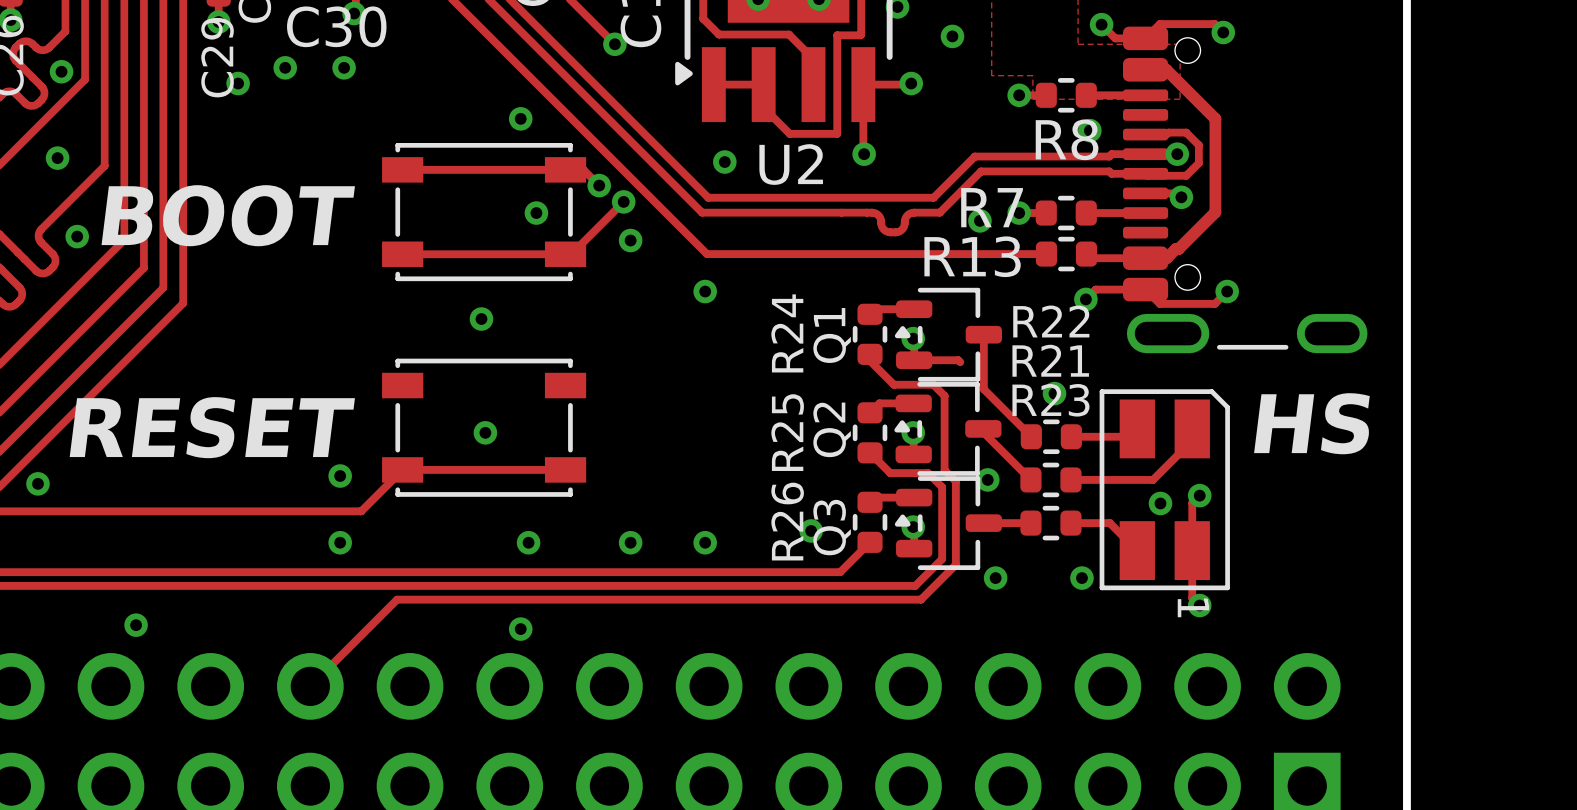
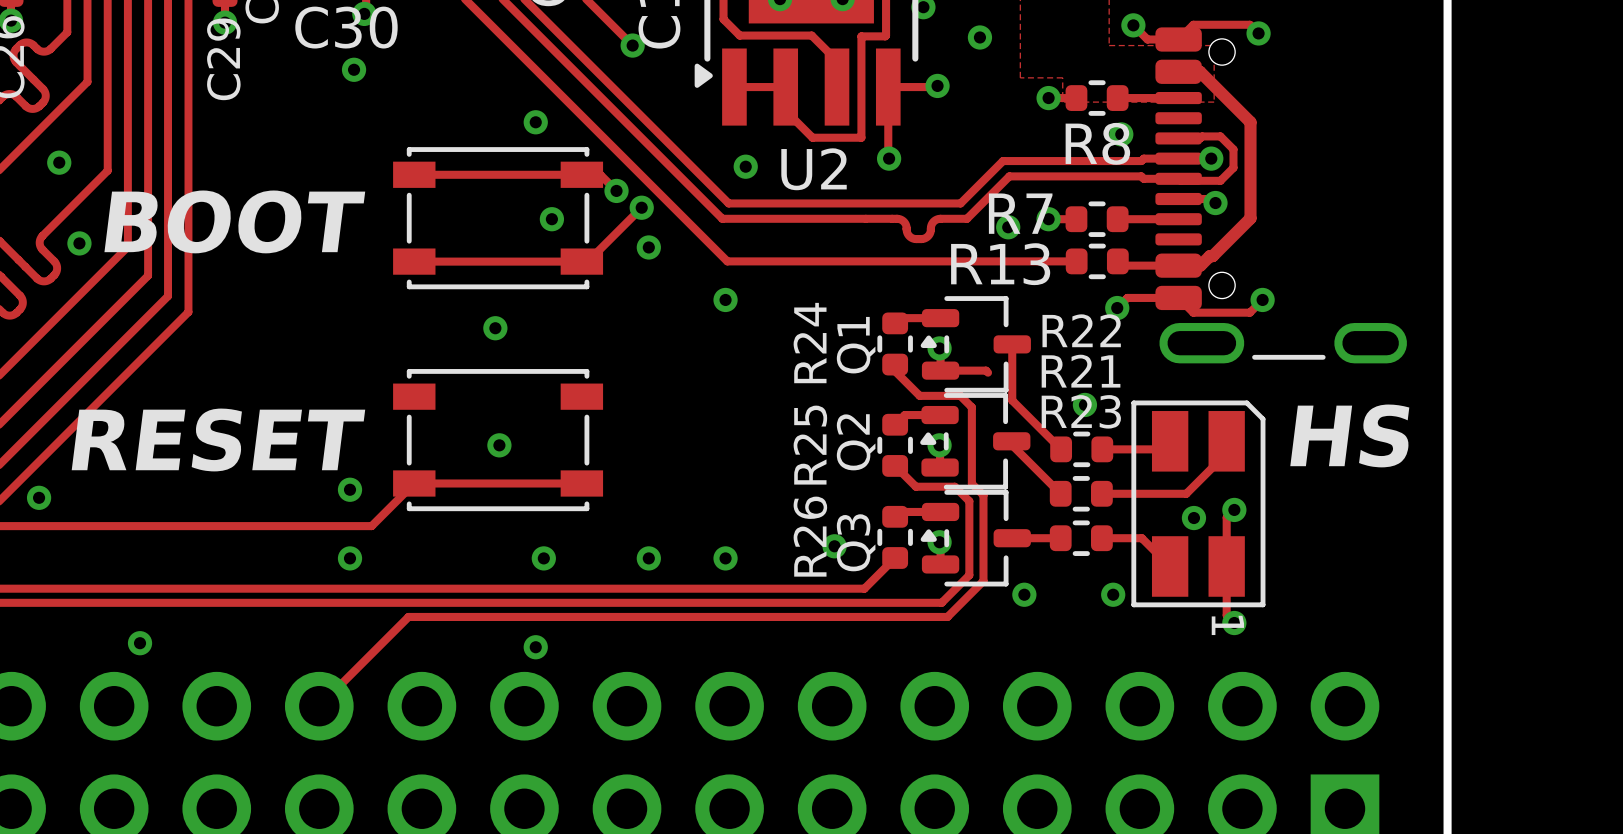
via: (285, 67) -> none
via: (61, 71) -> none
via: (238, 83) -> none
via: (987, 479) -> none

